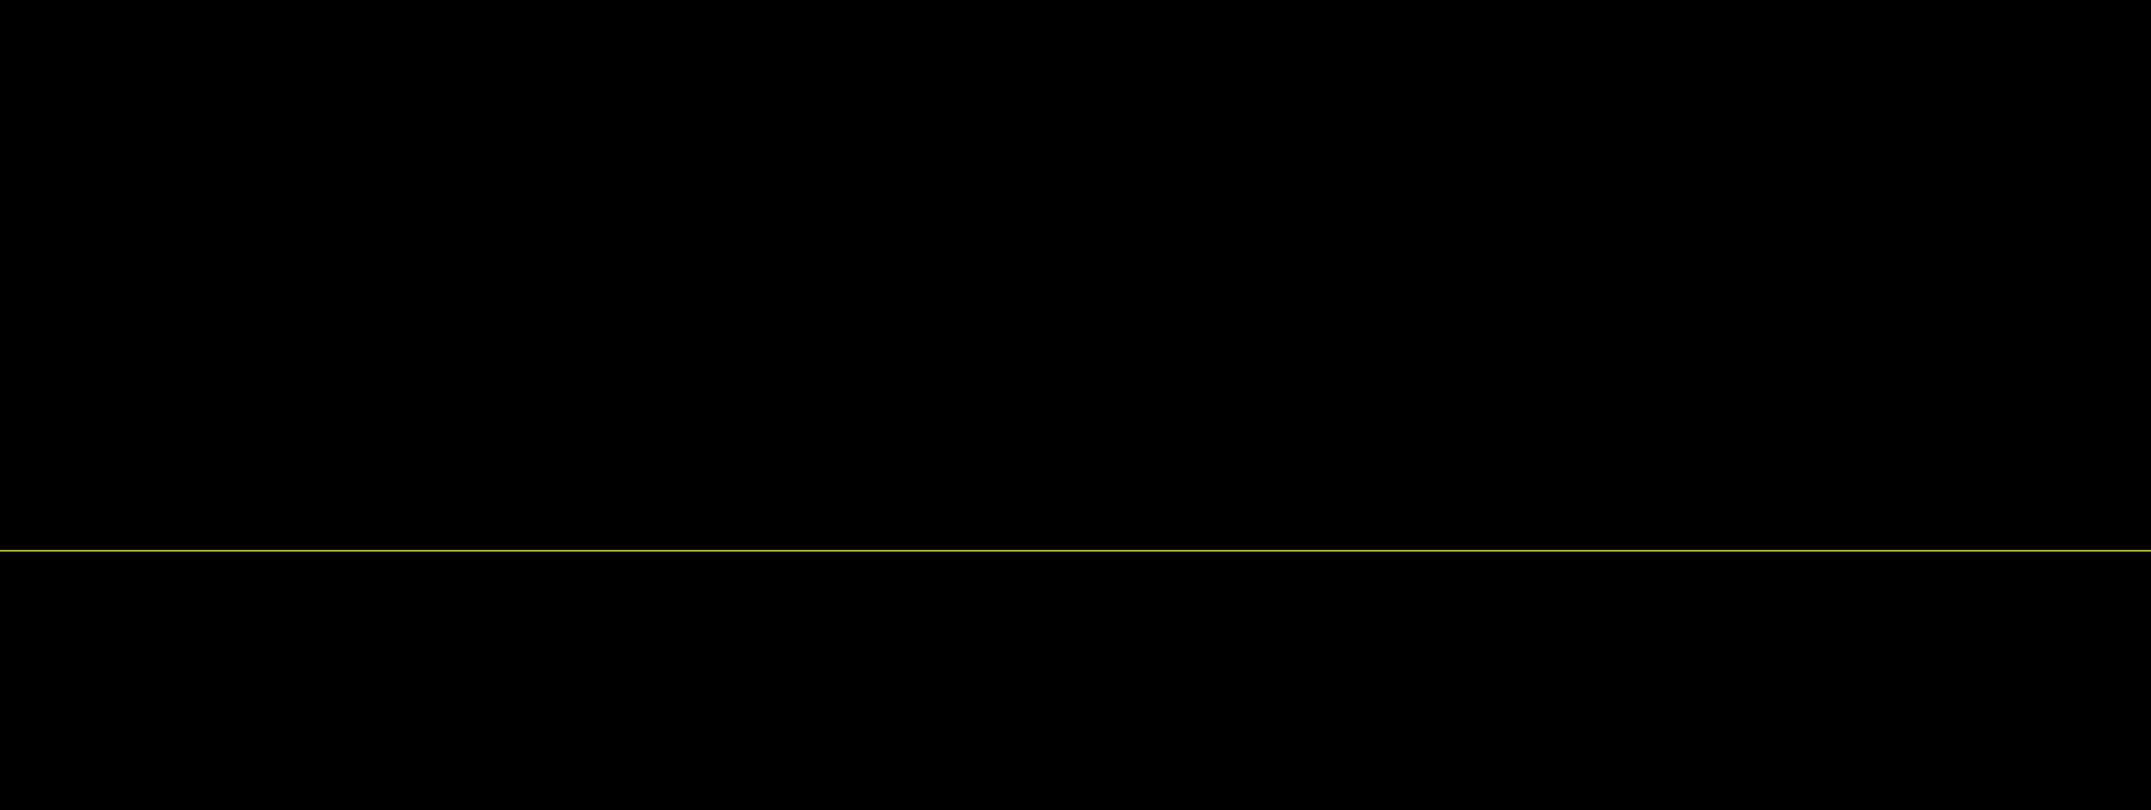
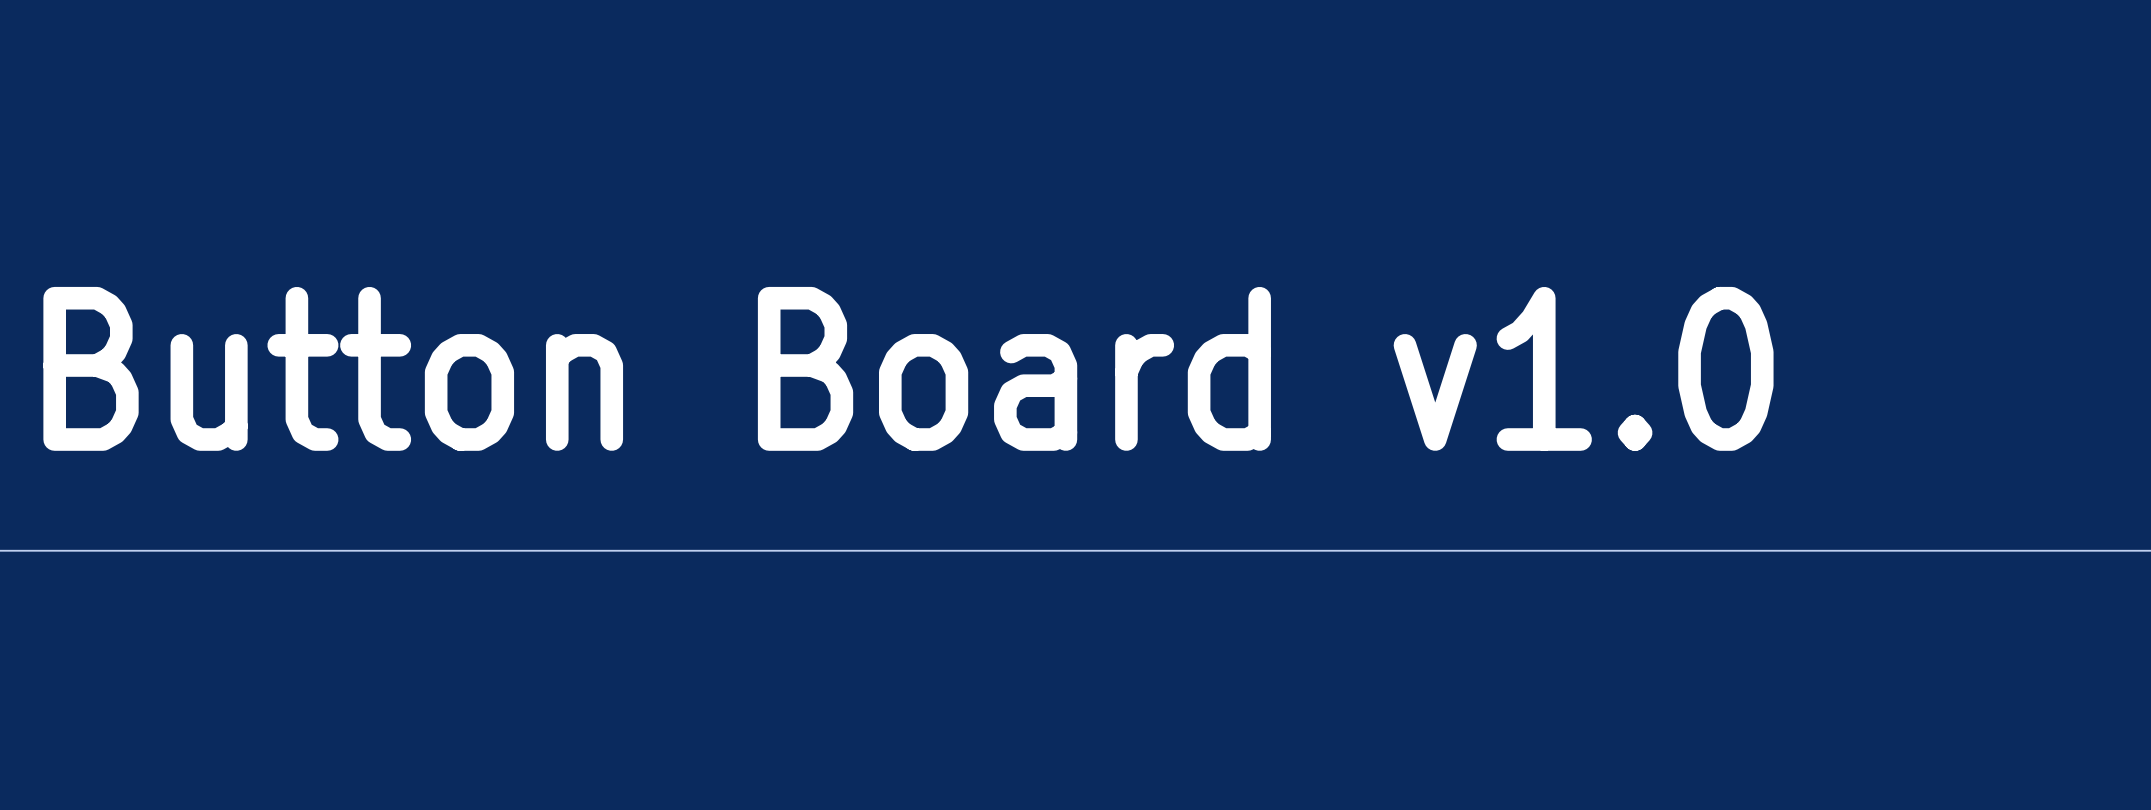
text: none -> Button Board v1.0 (908, 368)

